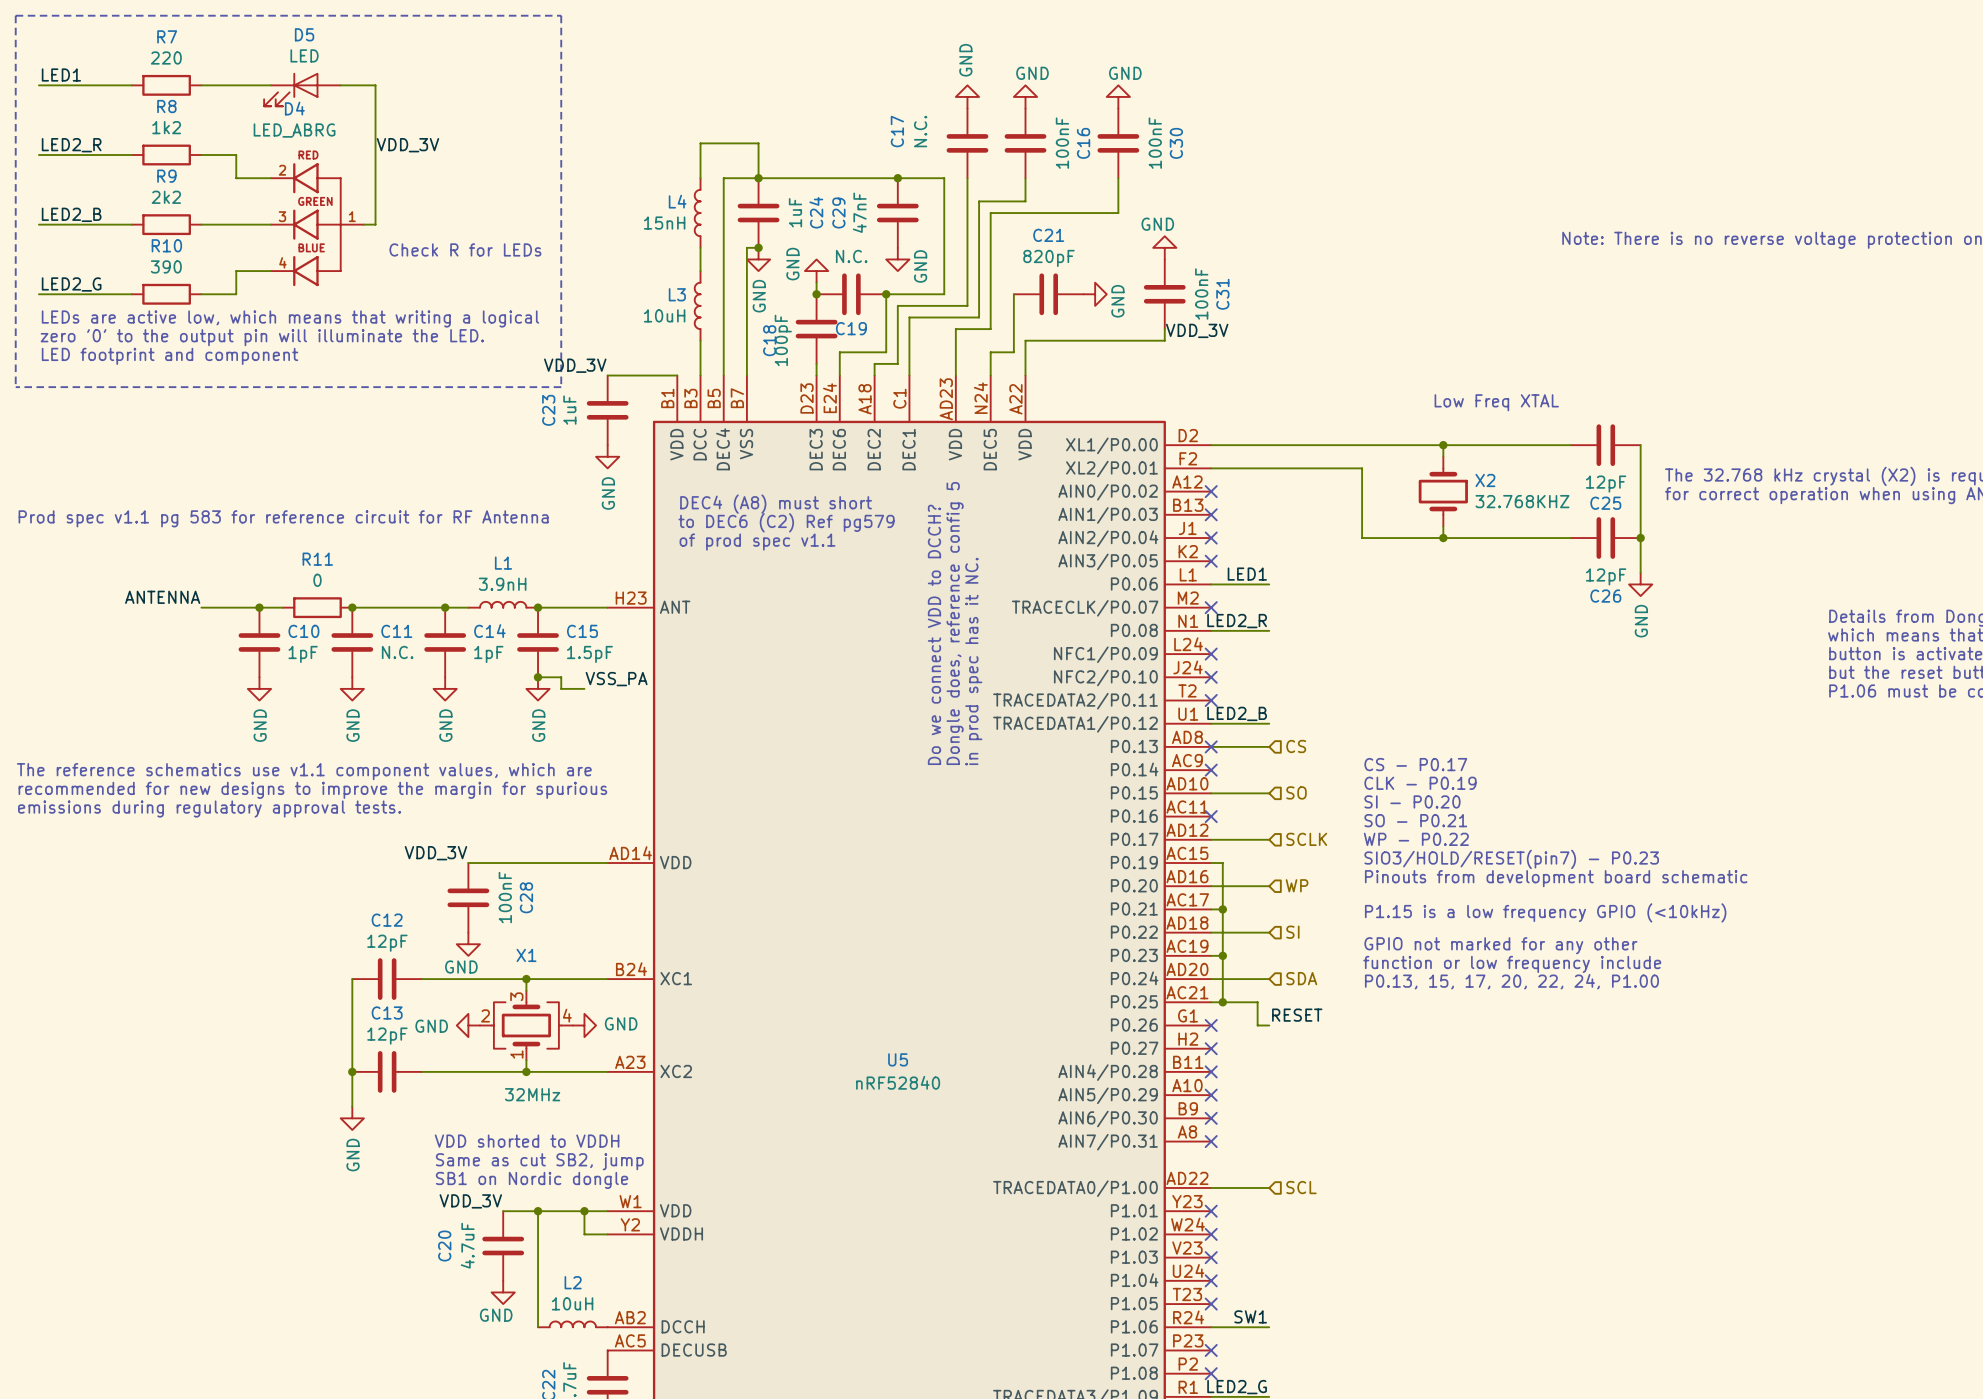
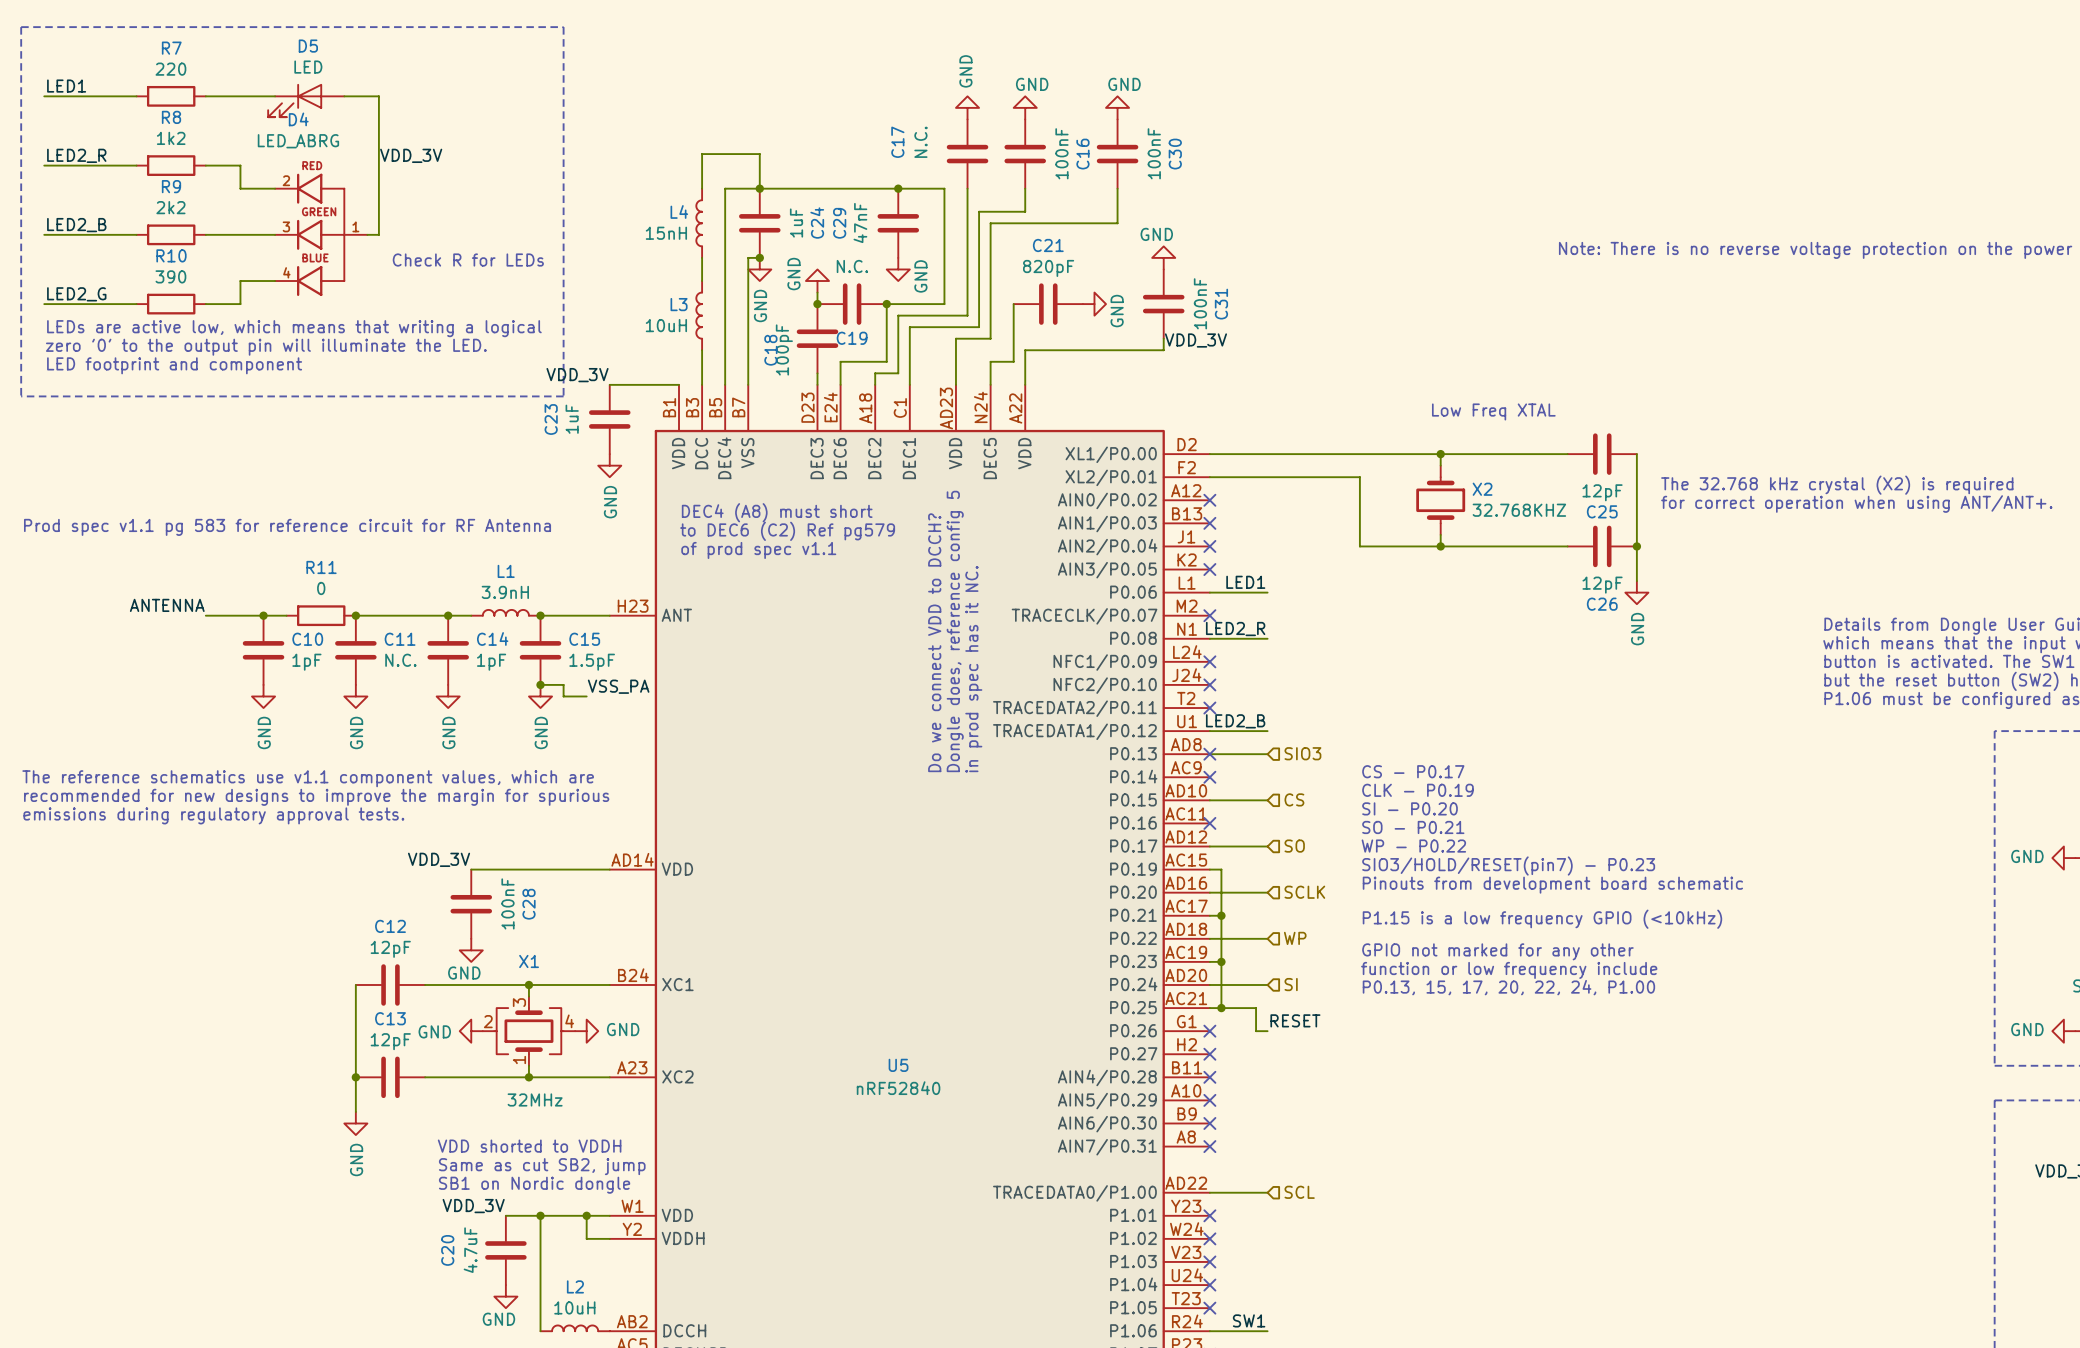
hierarchical label: CS (1296, 746) -> SIO3 (1302, 753)
hierarchical label: SO (1296, 792) -> CS (1294, 799)
hierarchical label: SCLK (1306, 839) -> SO (1294, 846)
hierarchical label: WP (1297, 885) -> SCLK (1304, 892)
hierarchical label: SI (1292, 932) -> WP (1295, 938)
hierarchical label: SDA (1301, 978) -> SI (1291, 984)

